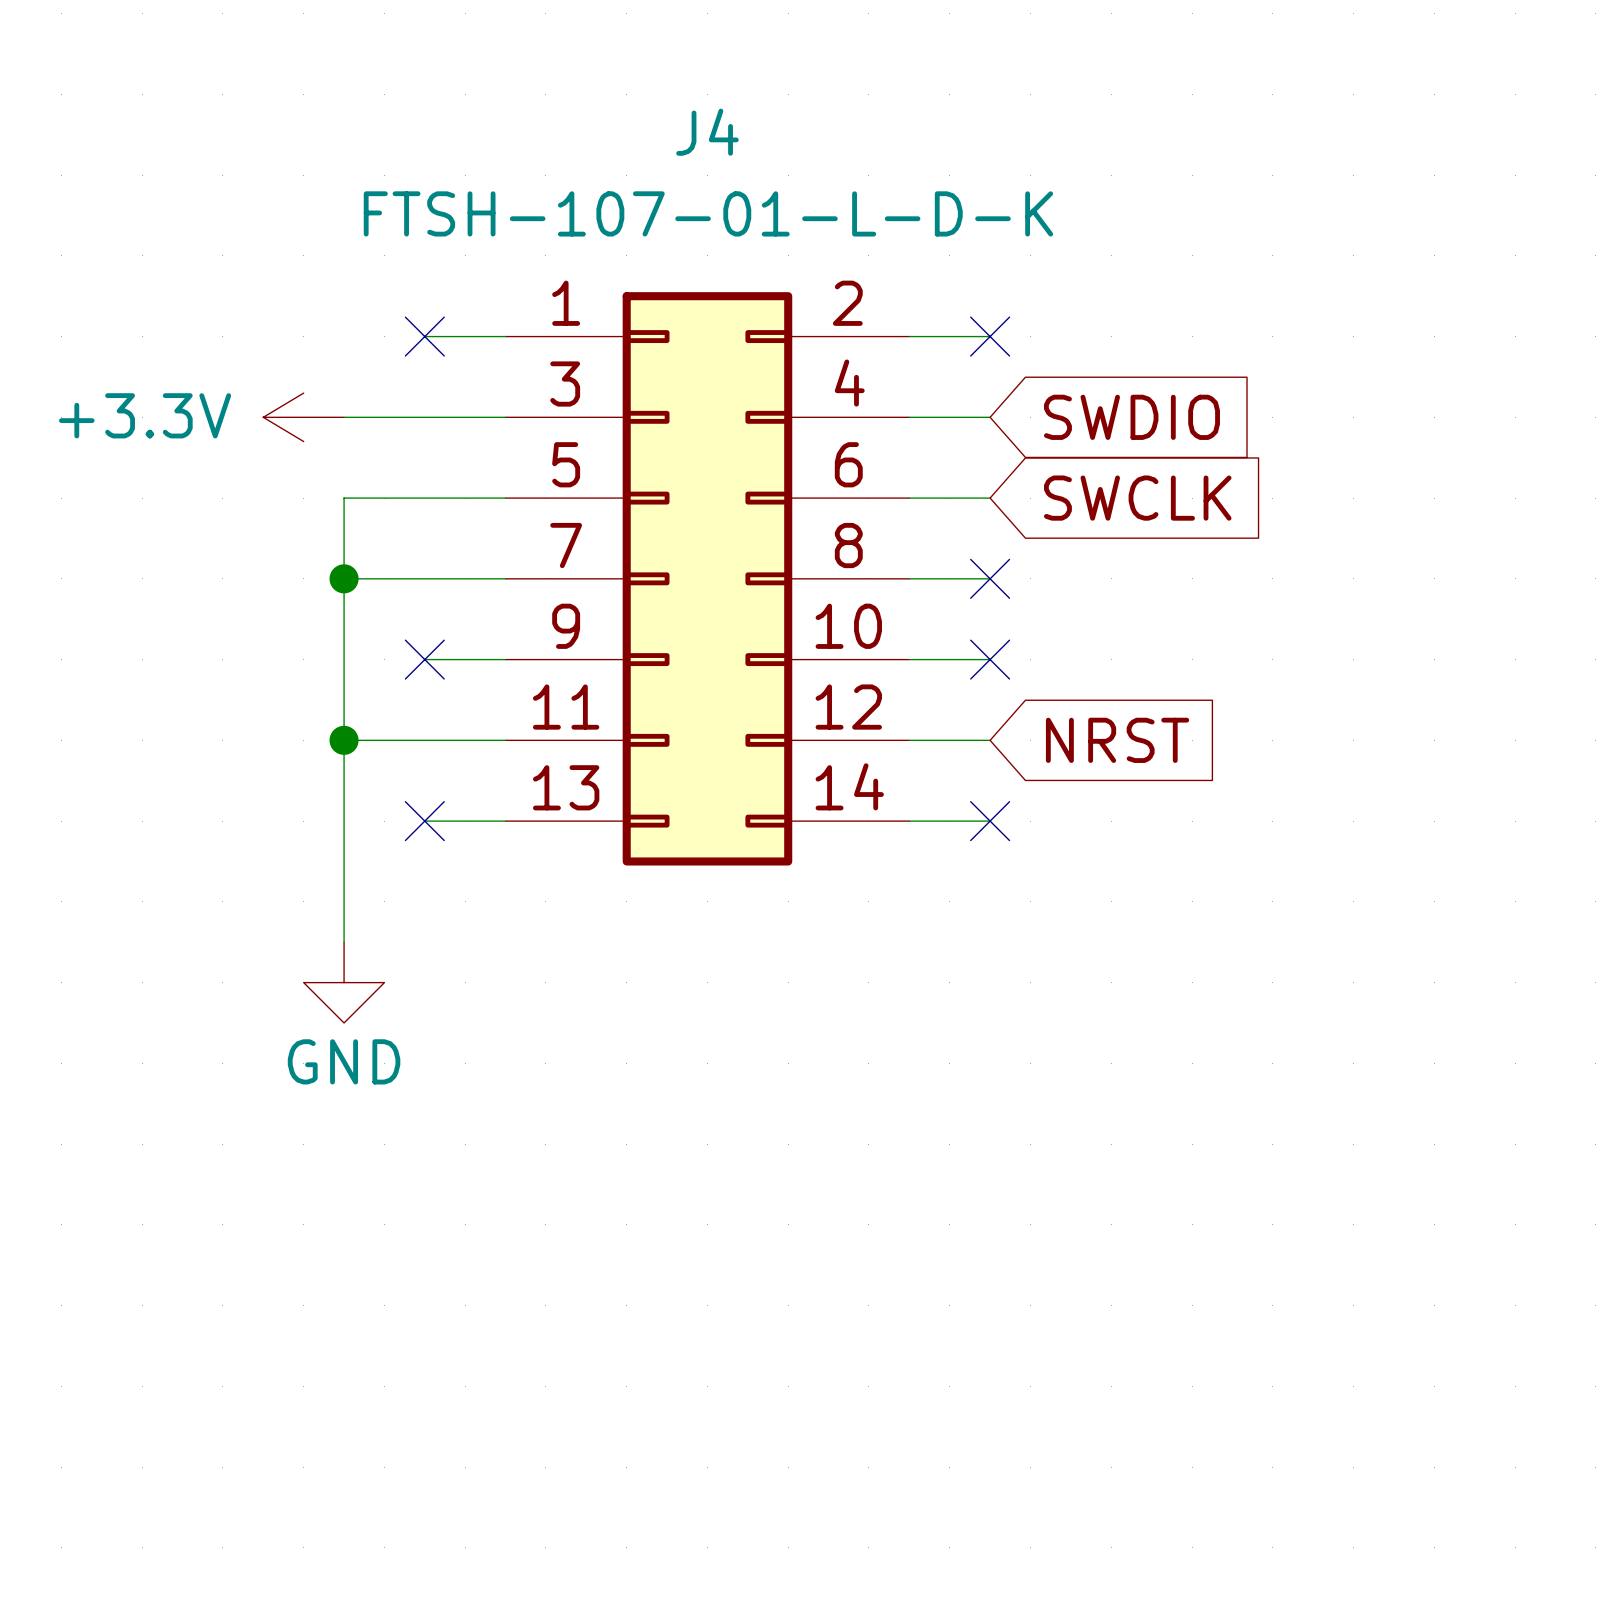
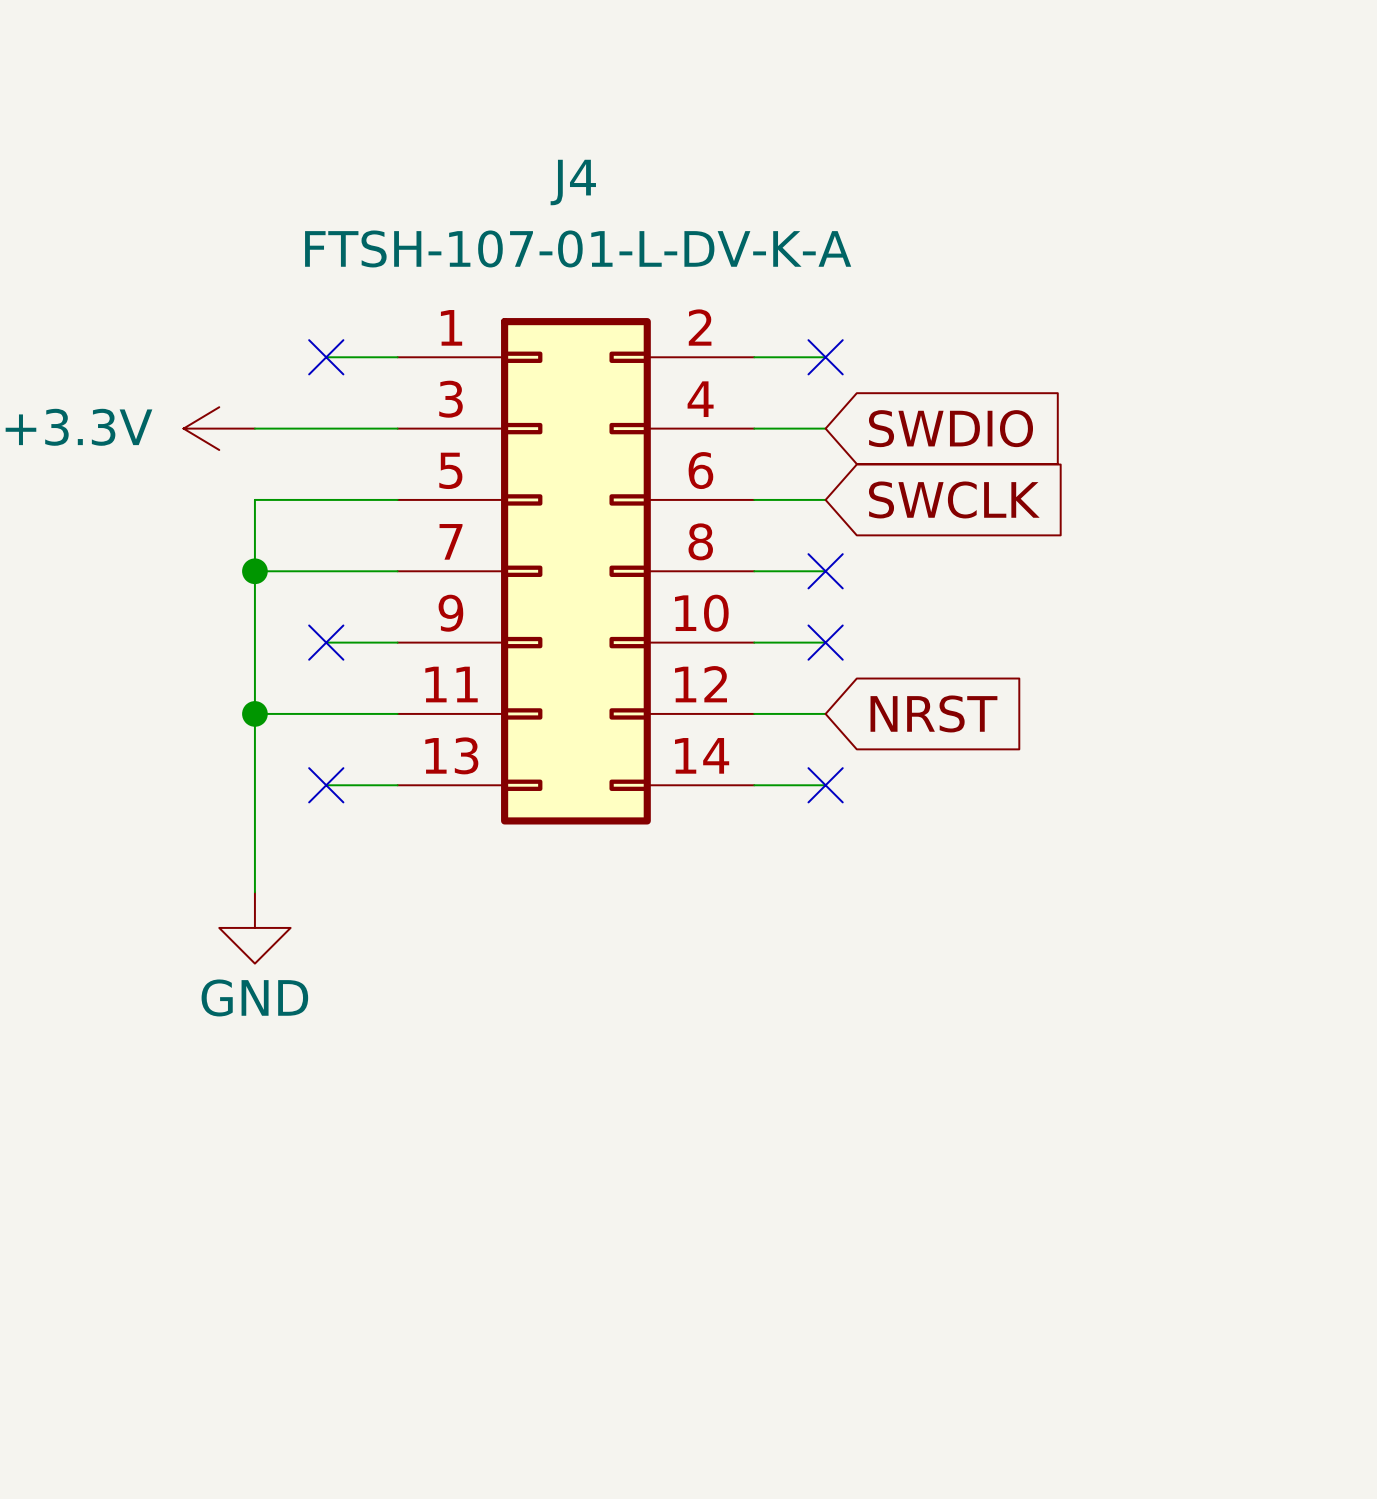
J4 value: FTSH-107-01-L-D-K (708, 213) -> FTSH-107-01-L-DV-K-A (578, 248)

